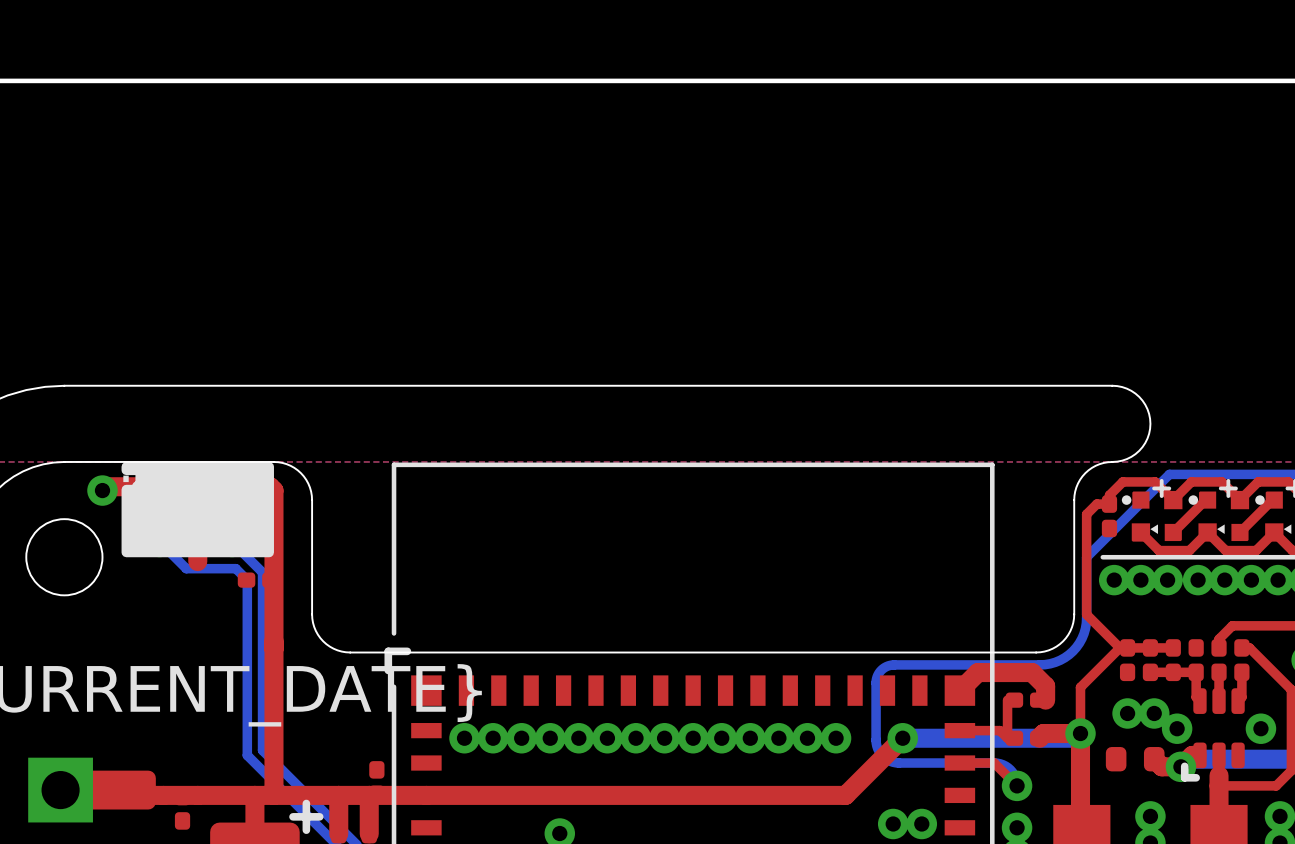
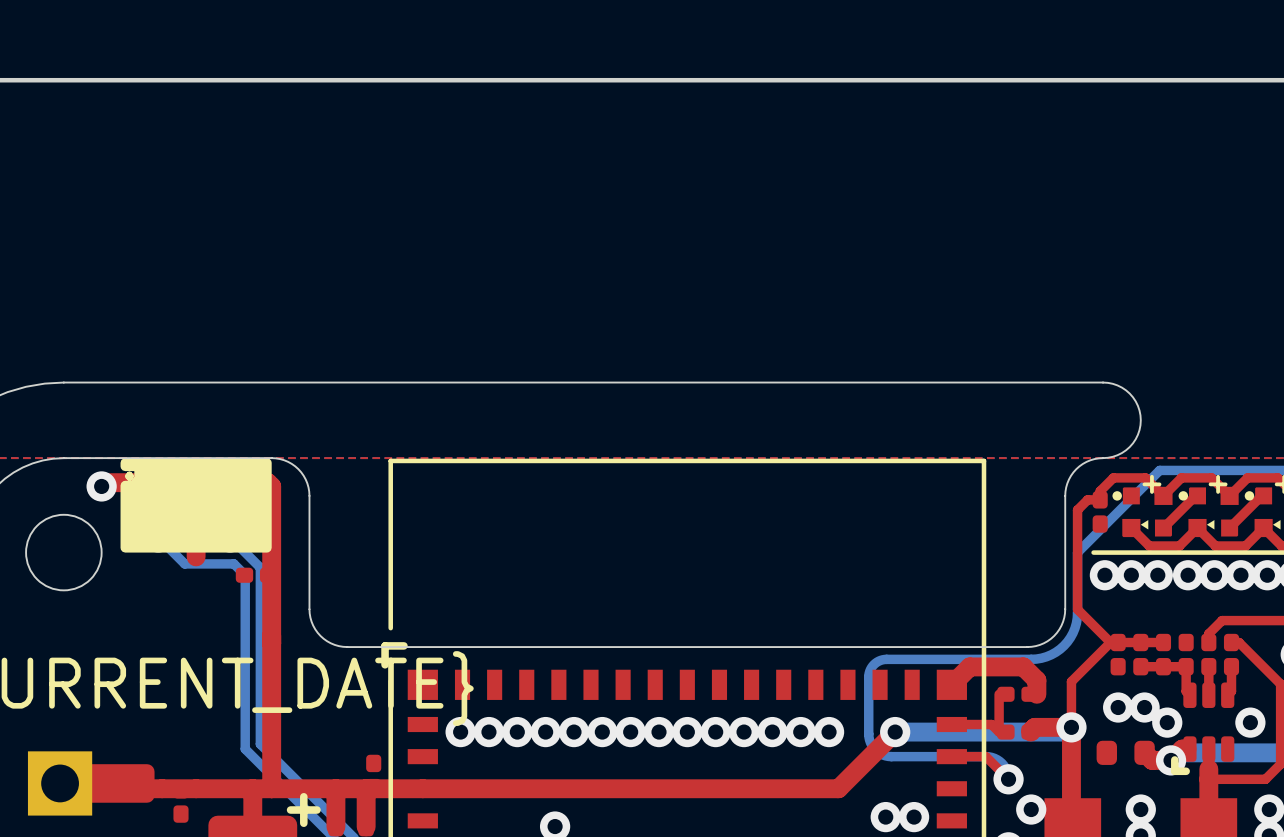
via position: (1017, 827) -> (1031, 809)

